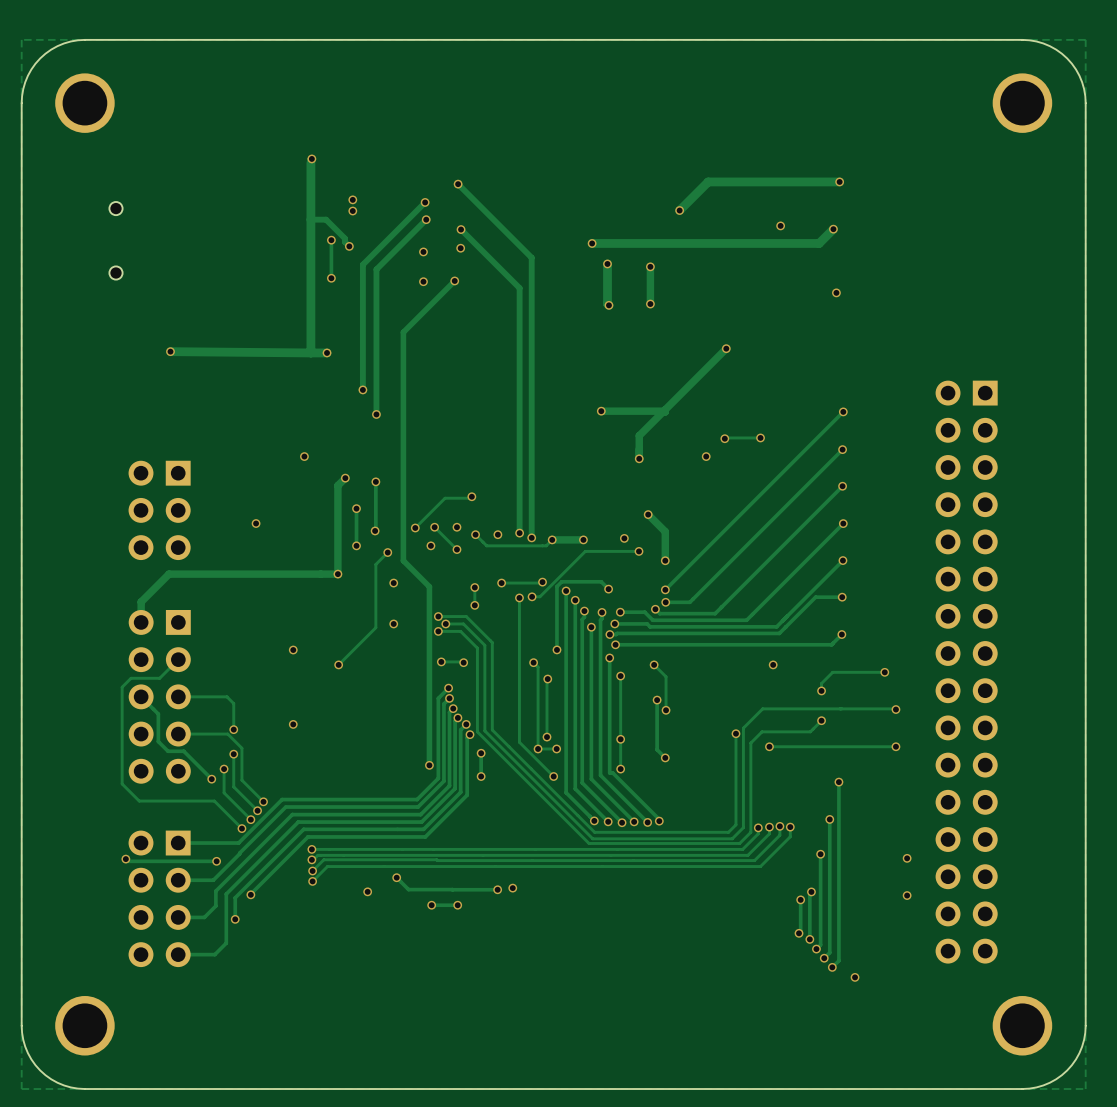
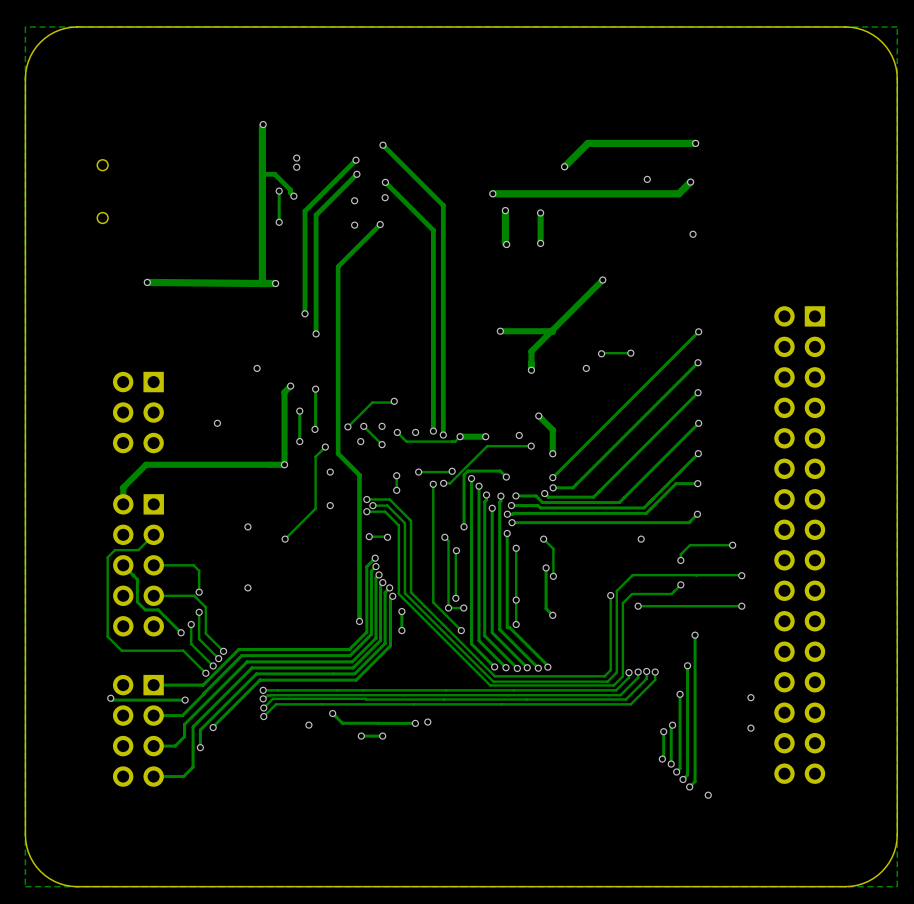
part: (84, 103) -> none
part: (1022, 103) -> none
part: (84, 1025) -> none
part: (1022, 1025) -> none

